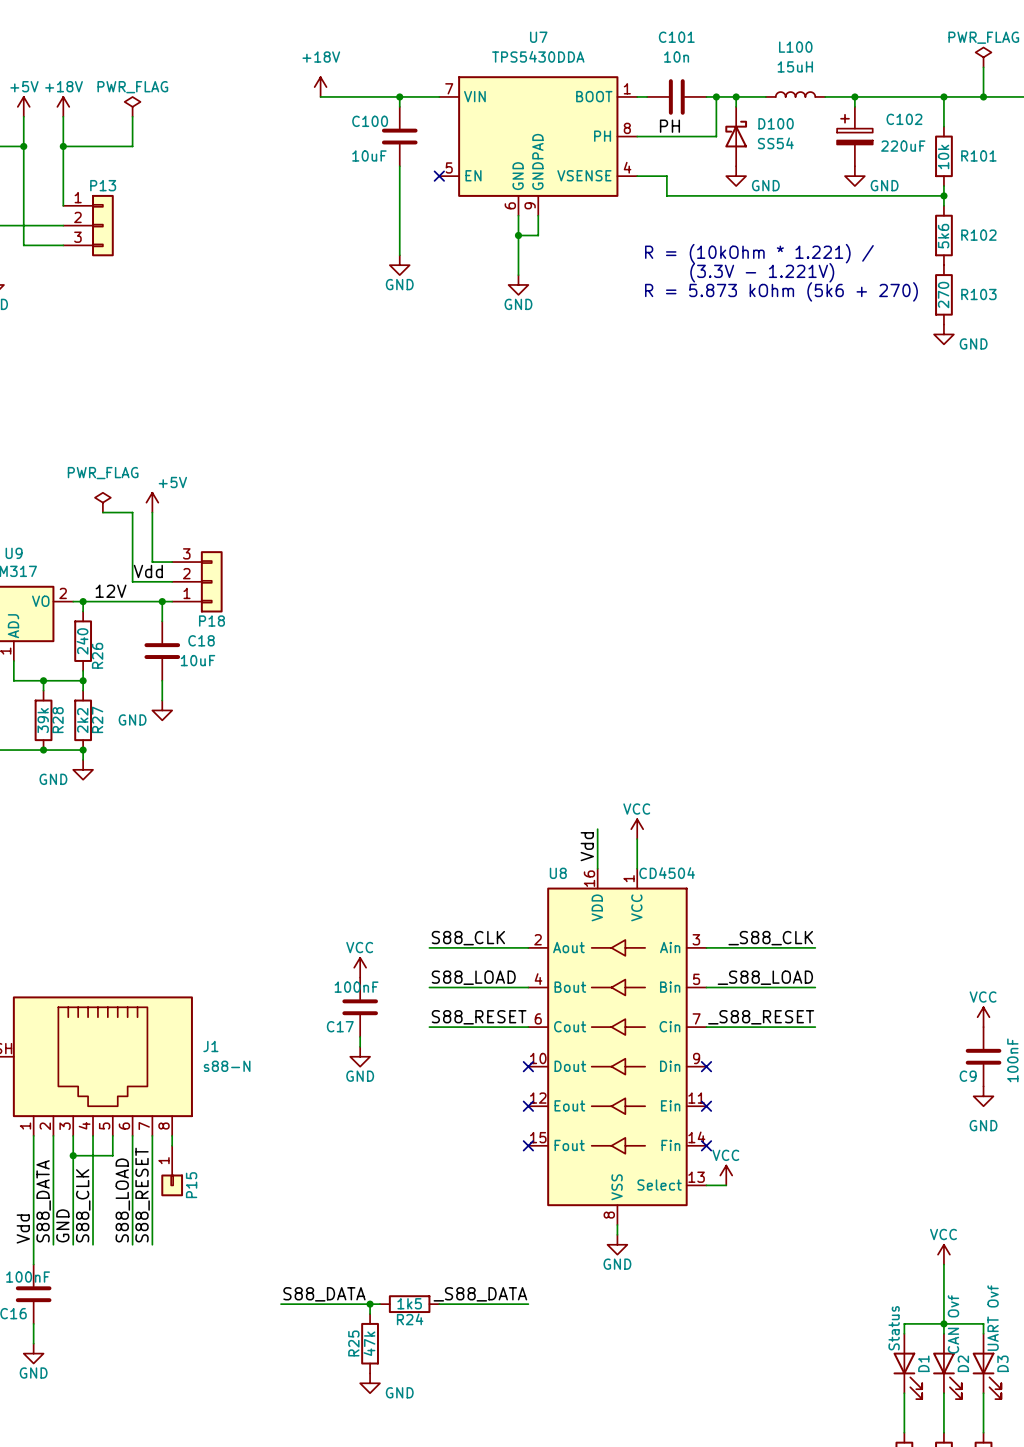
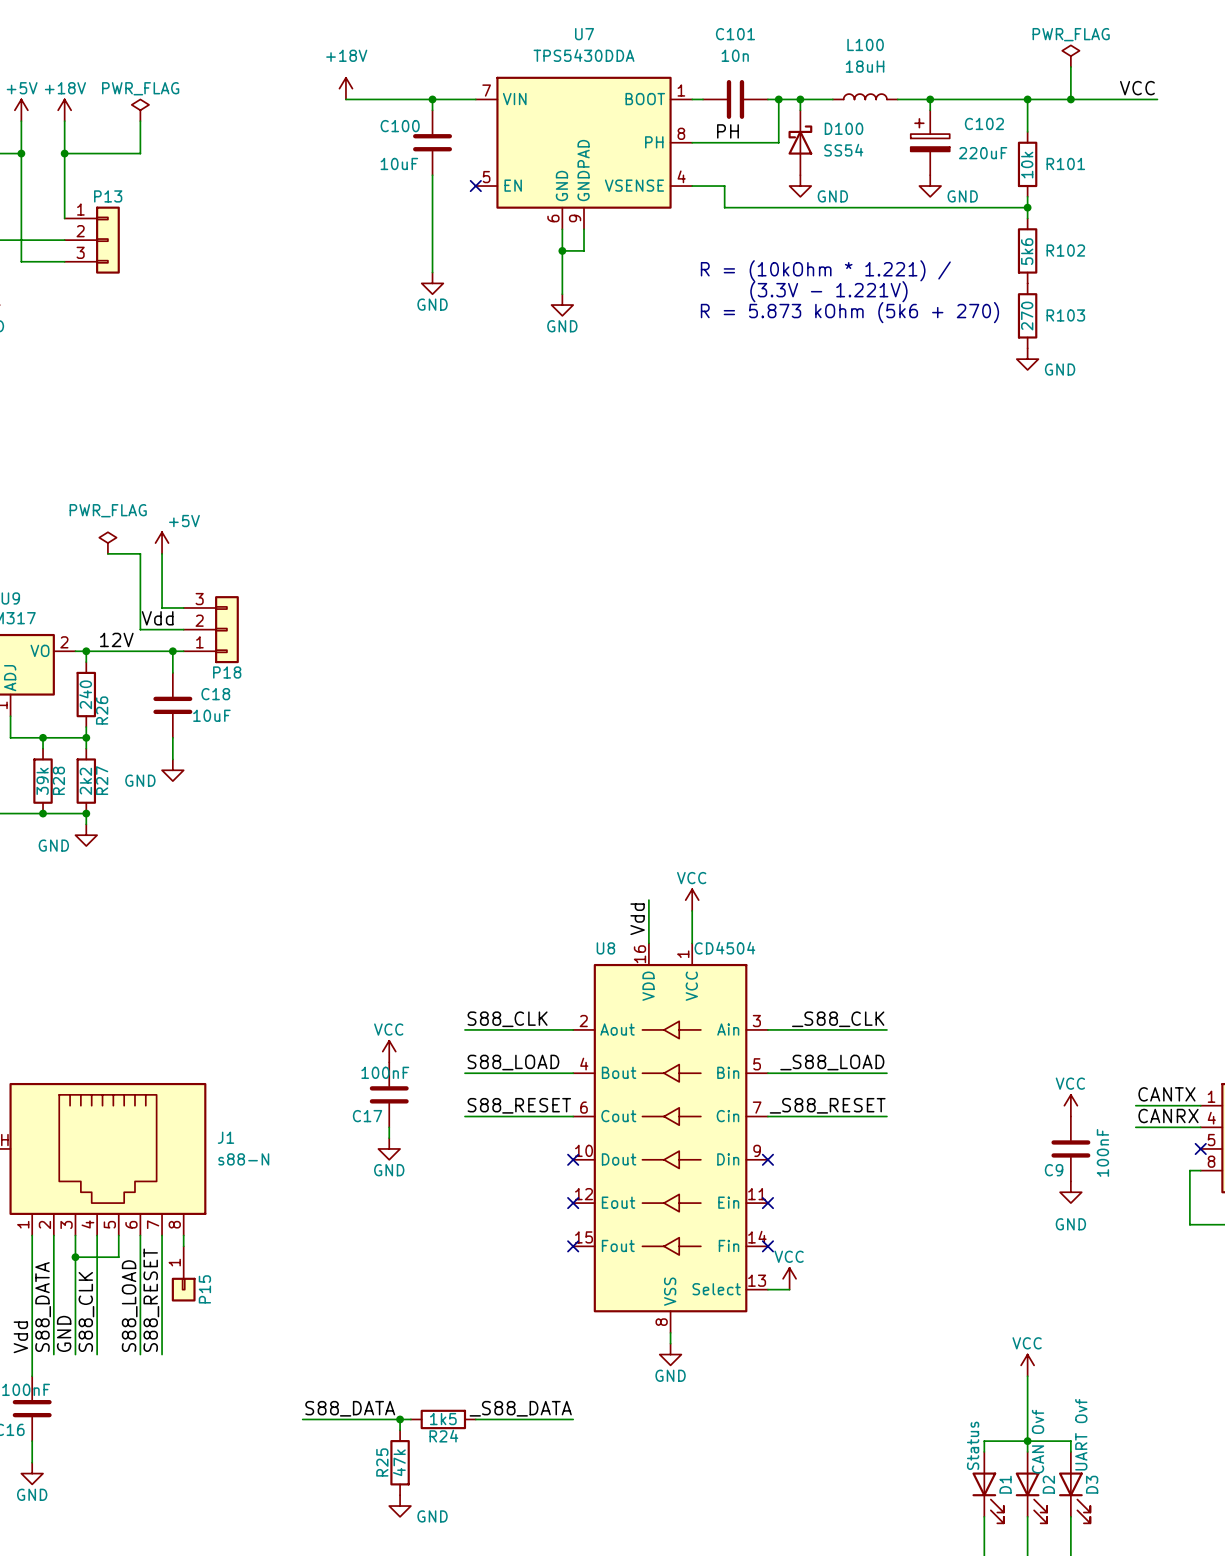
L100 value: 15uH (795, 66) -> 18uH (865, 66)

